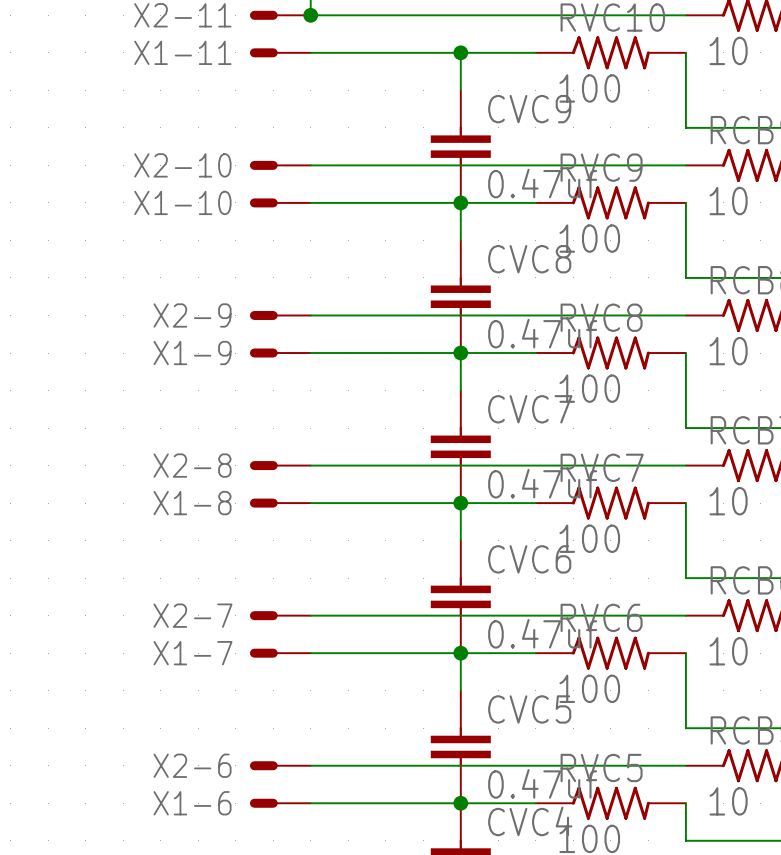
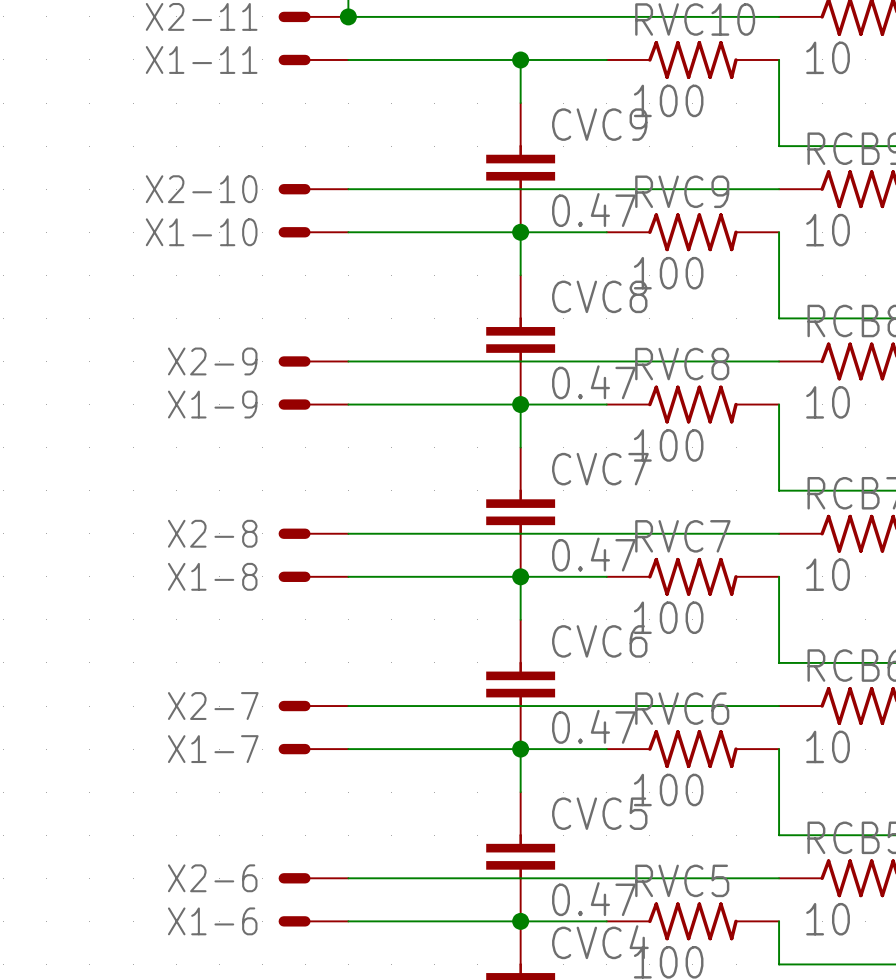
CVC9 value: 0.47uf (542, 183) -> 0.47 (593, 210)
CVC8 value: 0.47uf (542, 333) -> 0.47 (593, 382)
CVC7 value: 0.47uf (542, 483) -> 0.47 (593, 554)
CVC6 value: 0.47uf (542, 633) -> 0.47 (593, 726)
CVC5 value: 0.47uf (542, 783) -> 0.47 (593, 899)

